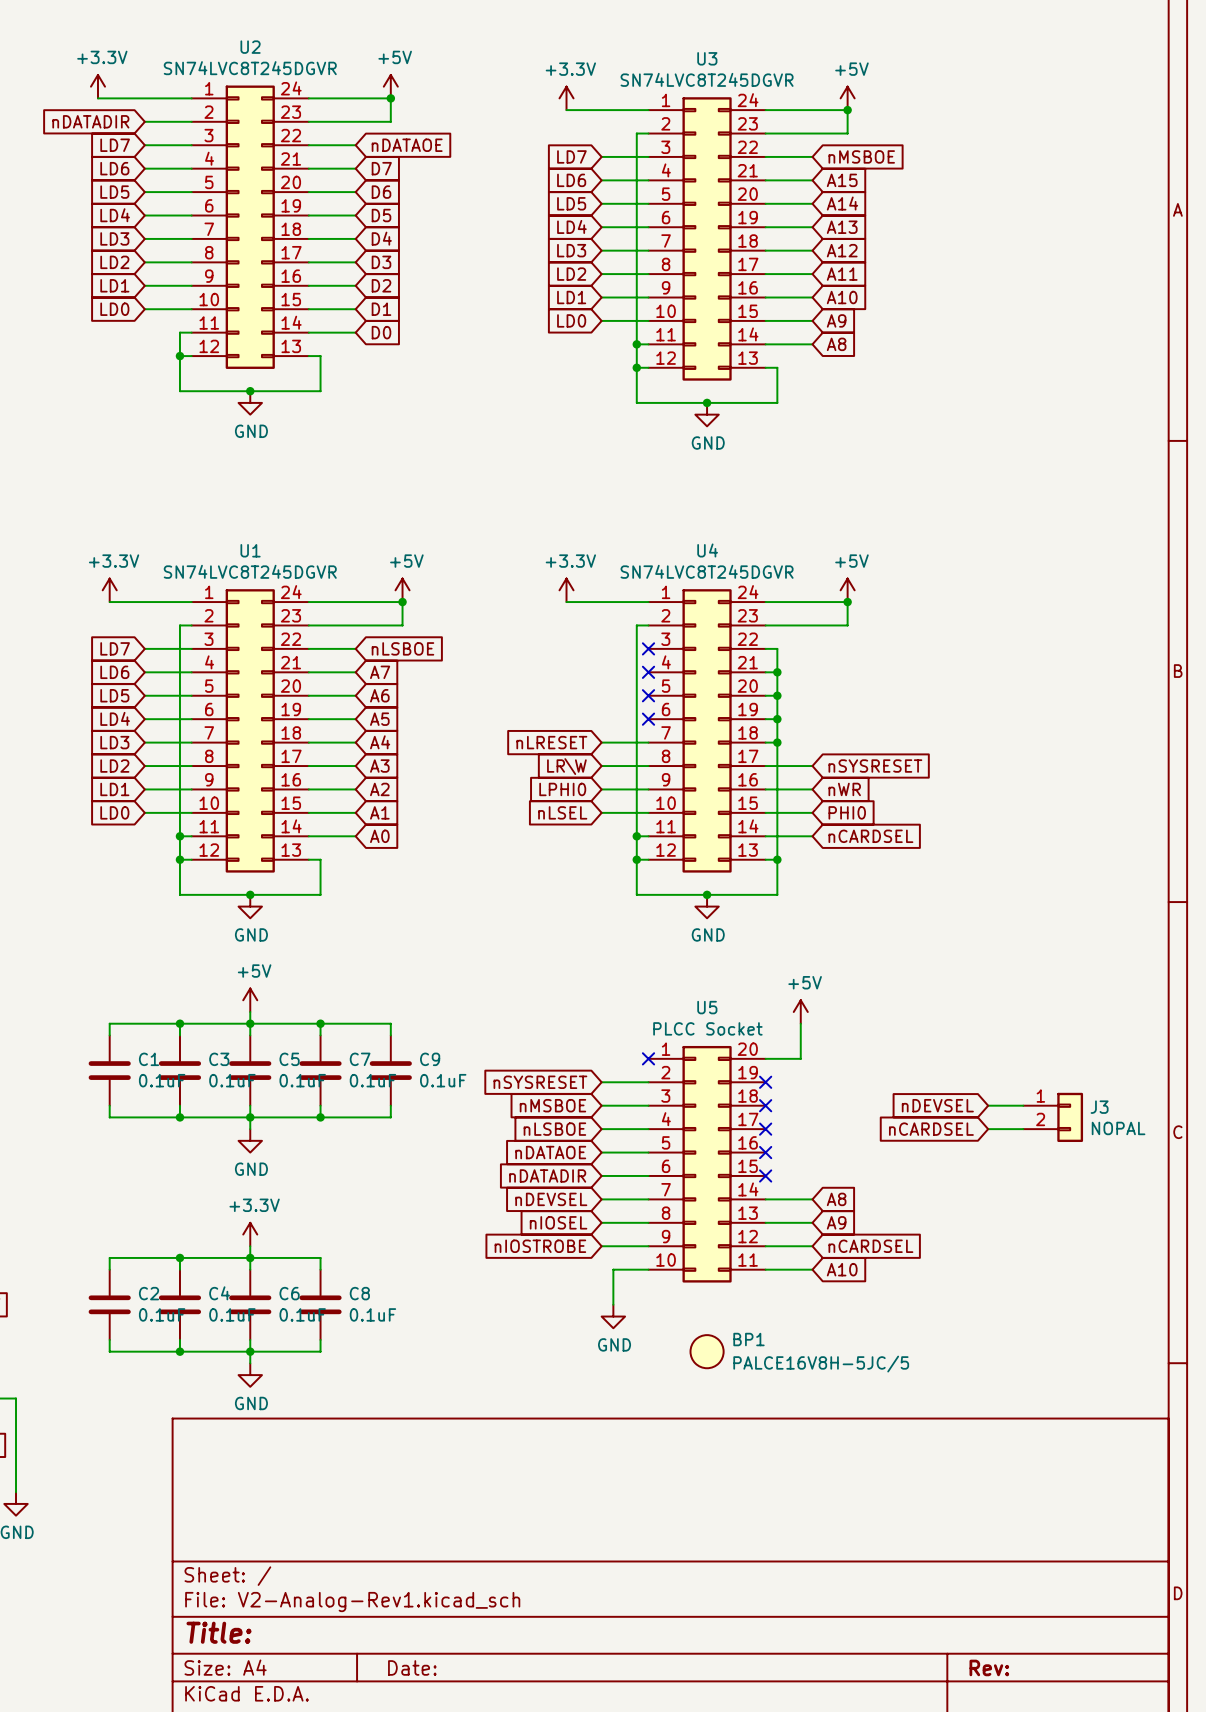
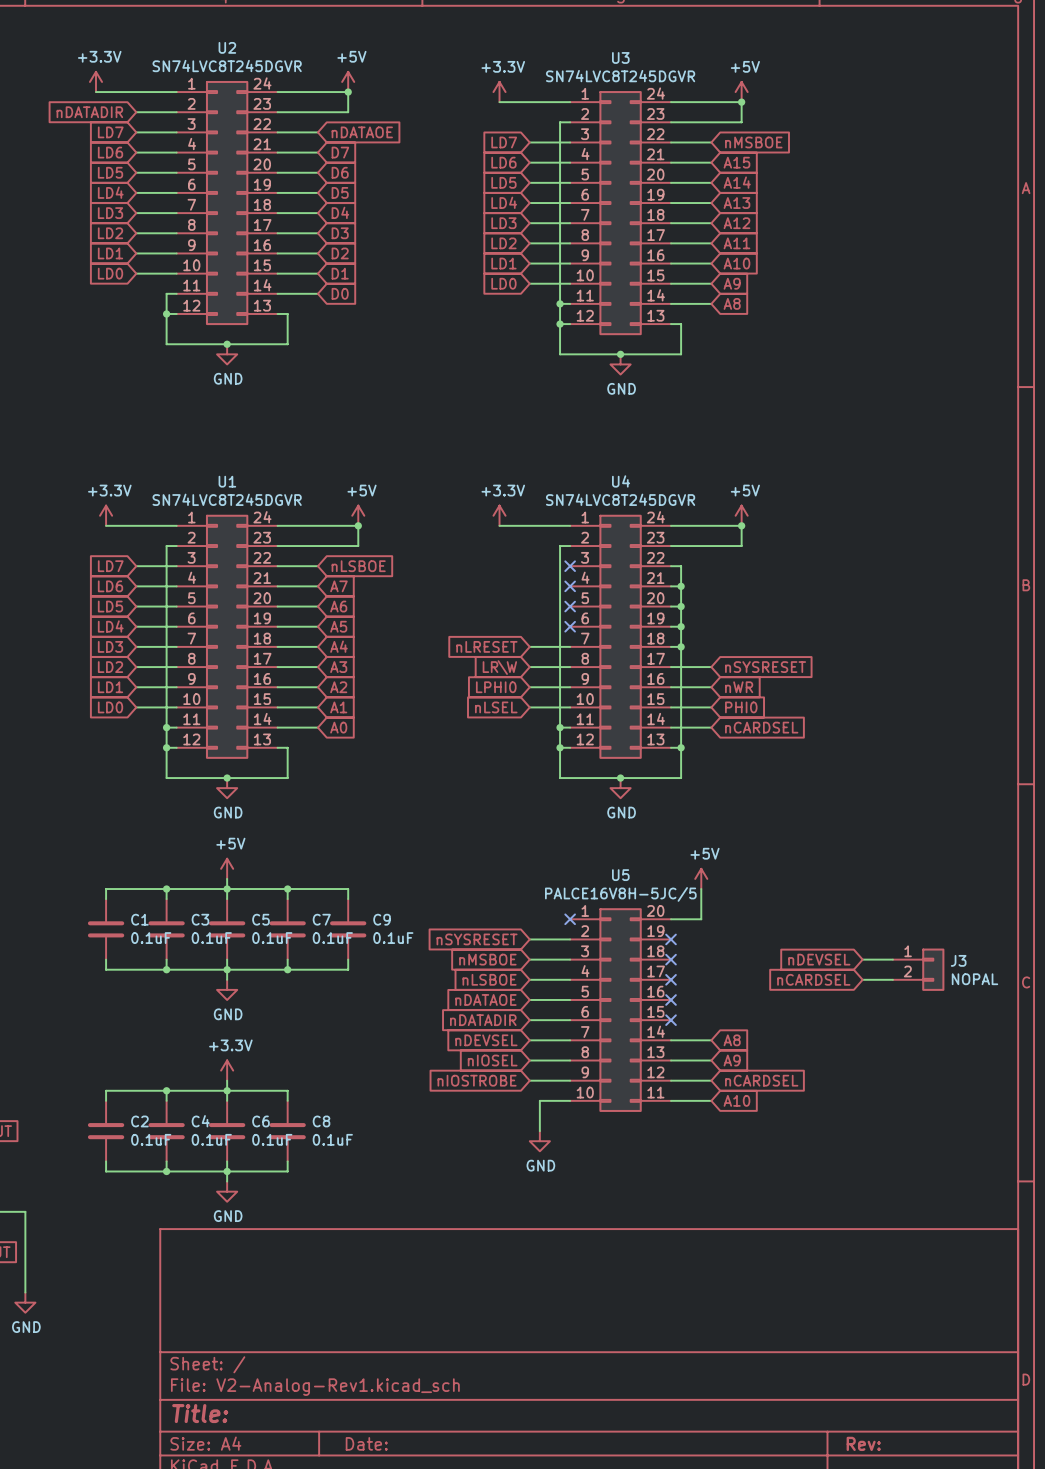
U5 value: PLCC Socket (707, 1028) -> PALCE16V8H-5JC/5 (620, 894)
BP1: PALCE16V8H-5JC/5 (707, 1351) -> none

